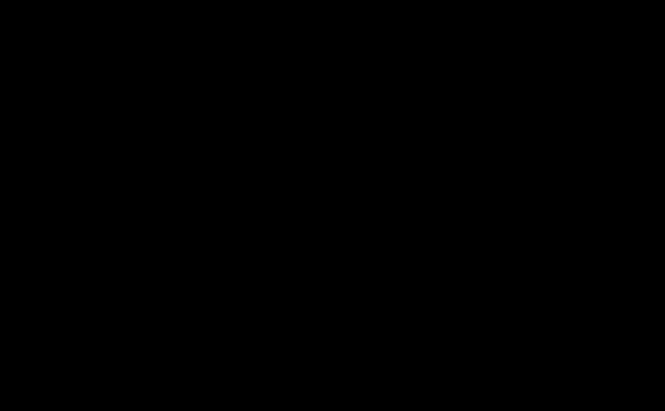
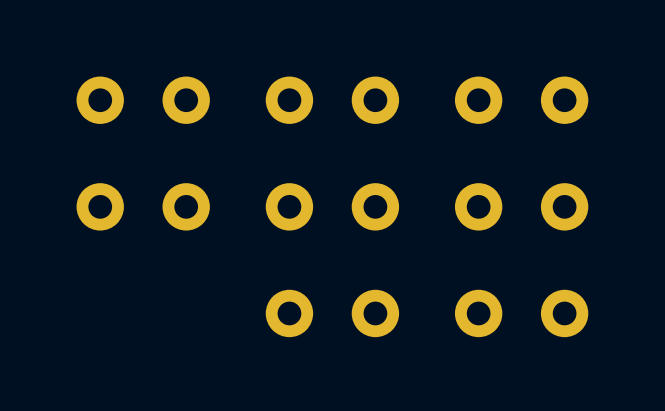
part: none -> (143, 100)
part: none -> (332, 100)
part: none -> (521, 100)
part: none -> (143, 206)
part: none -> (332, 206)
part: none -> (521, 206)
part: none -> (332, 313)
part: none -> (521, 313)

